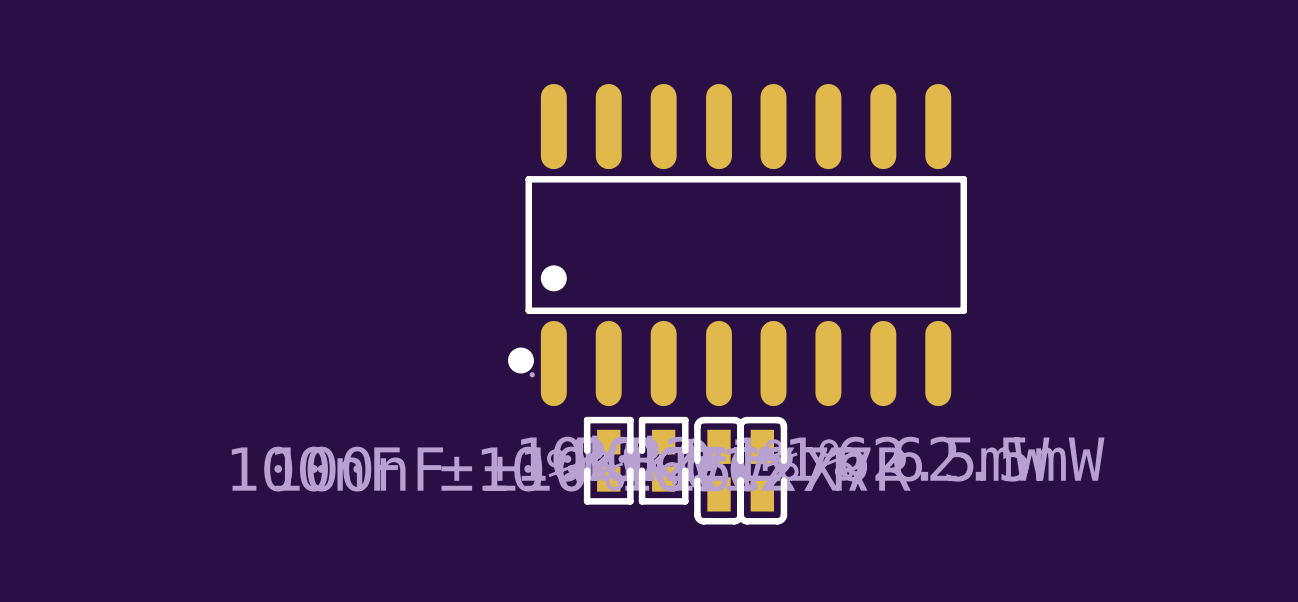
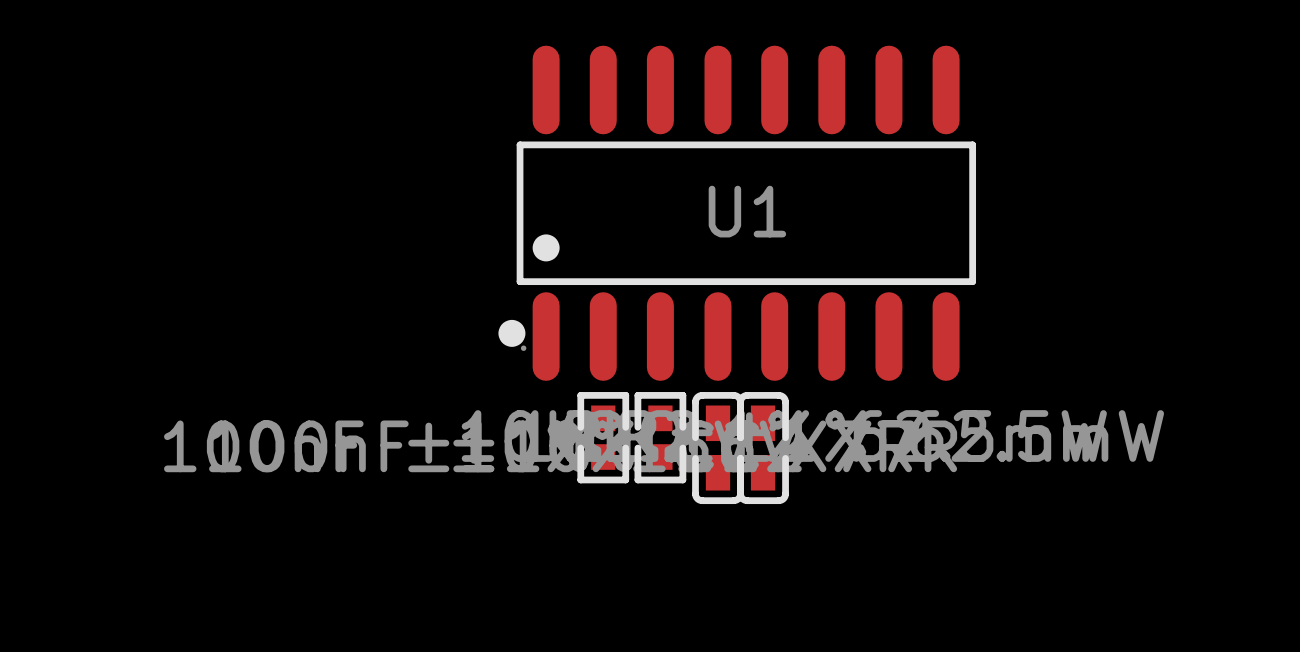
U1 name: none -> U1 (747, 211)

